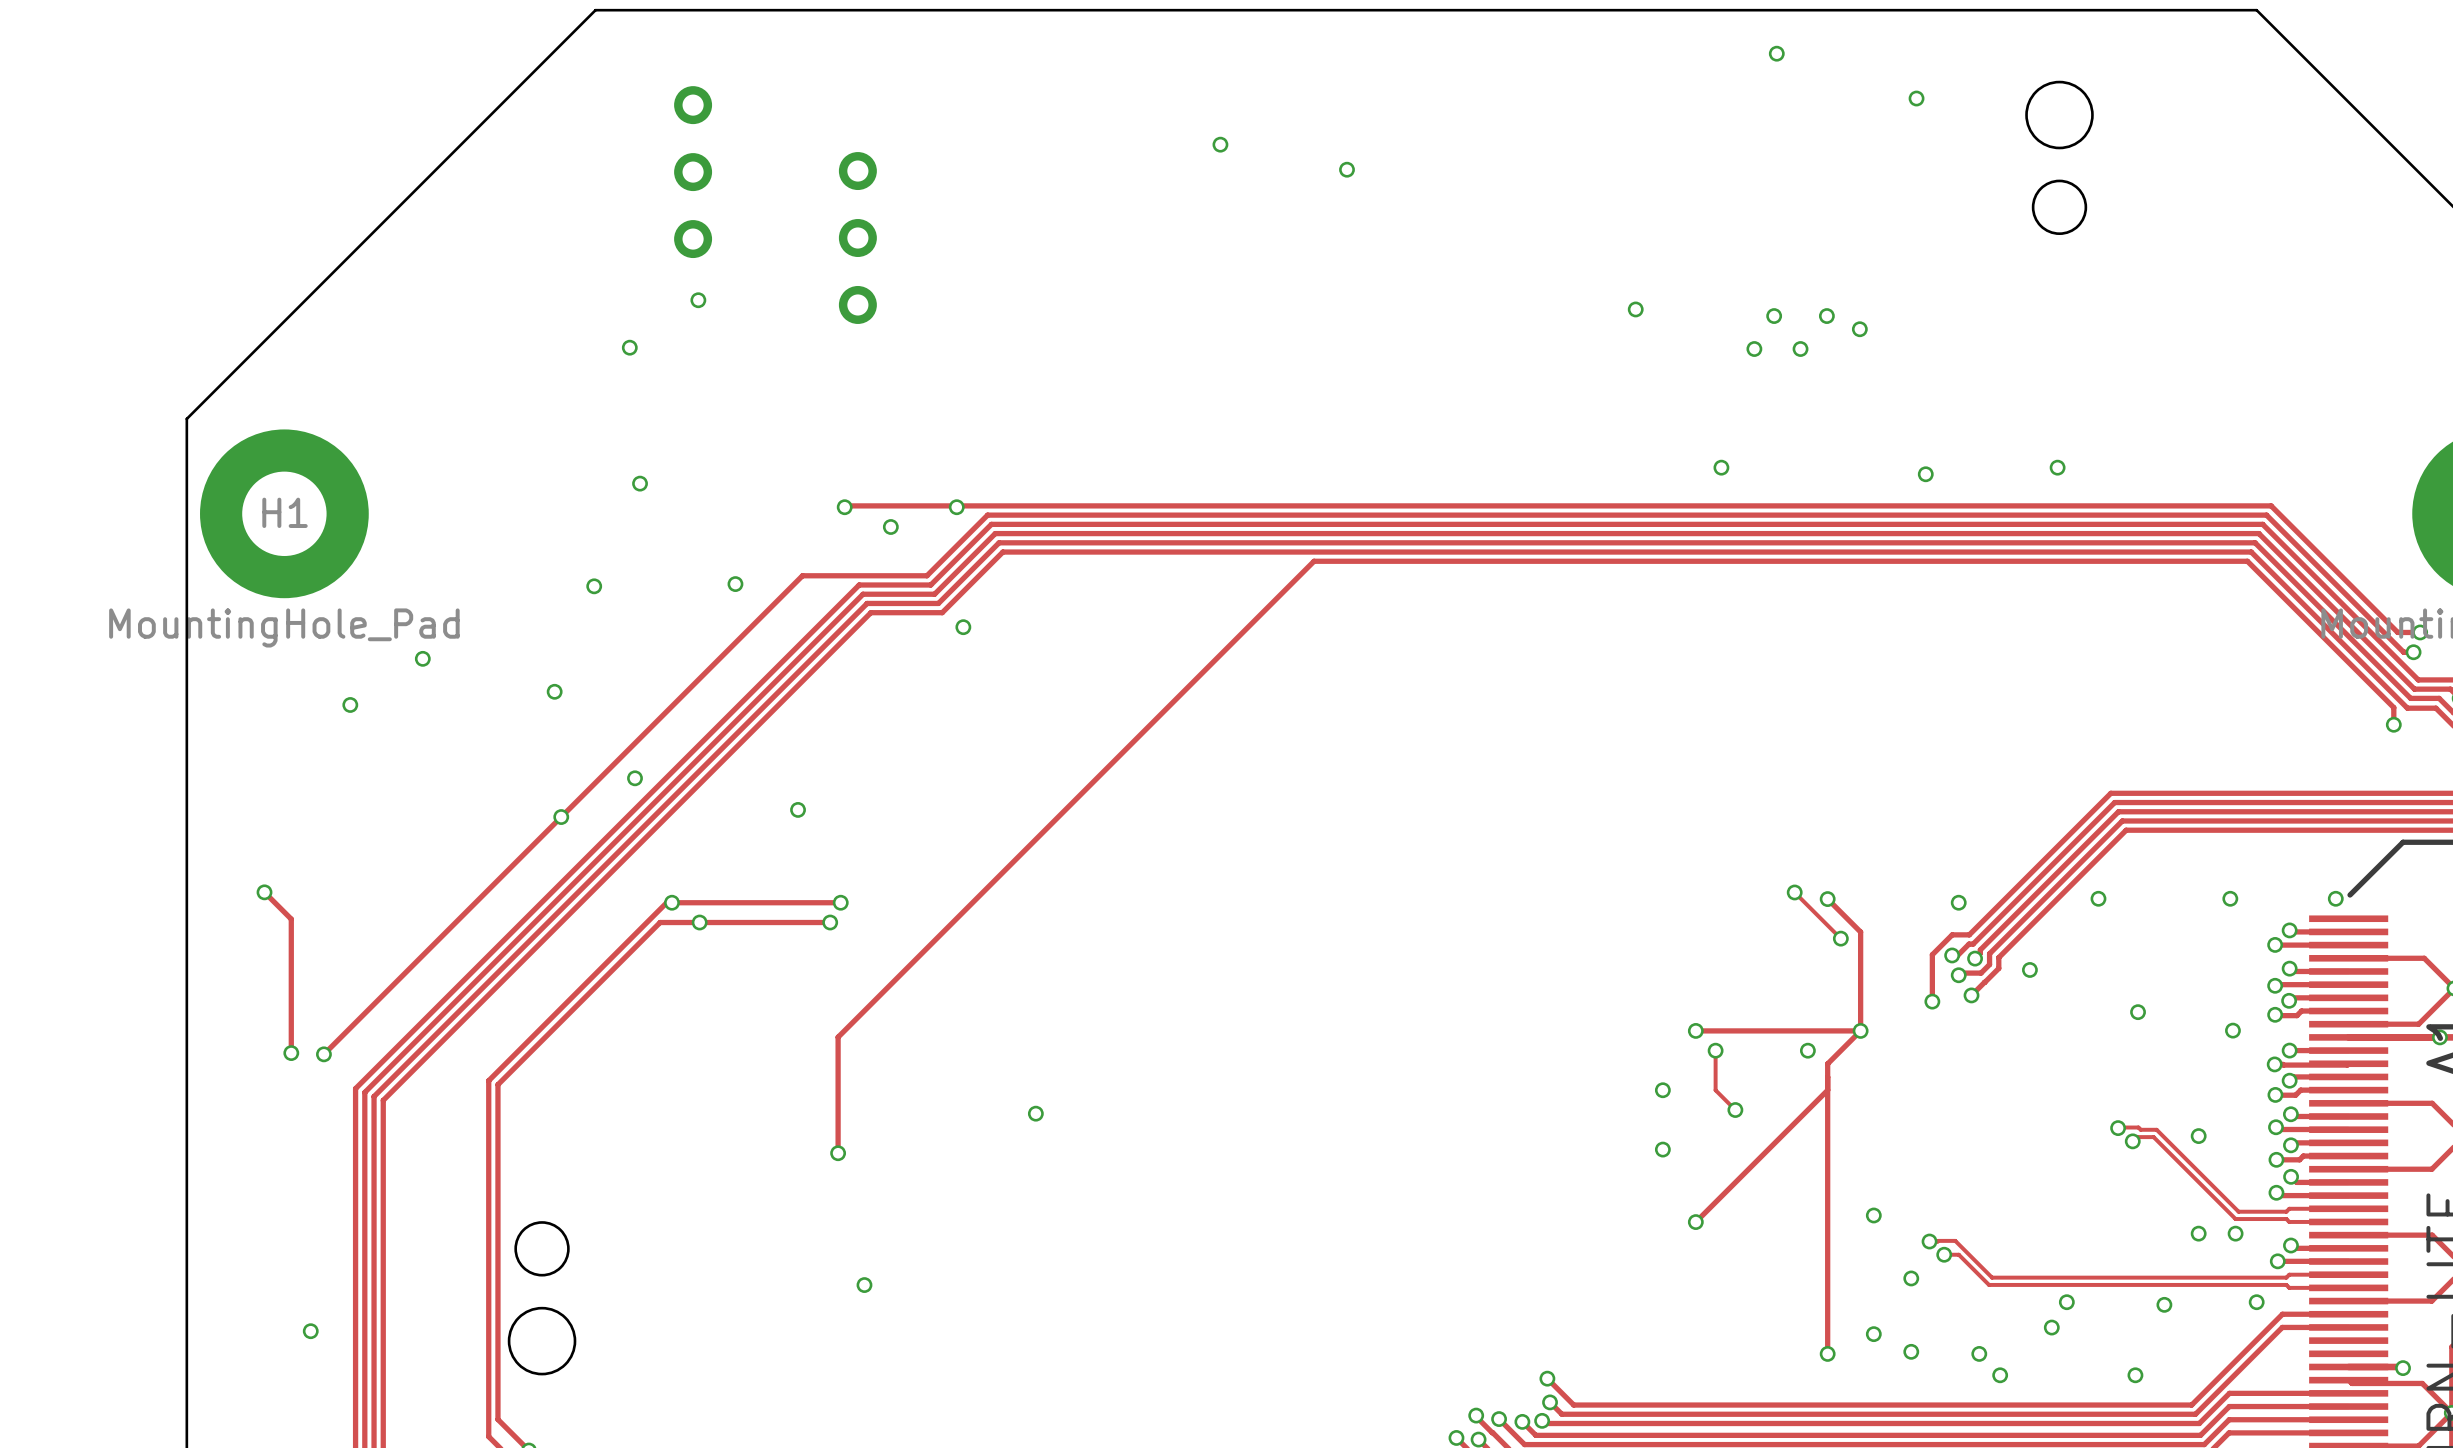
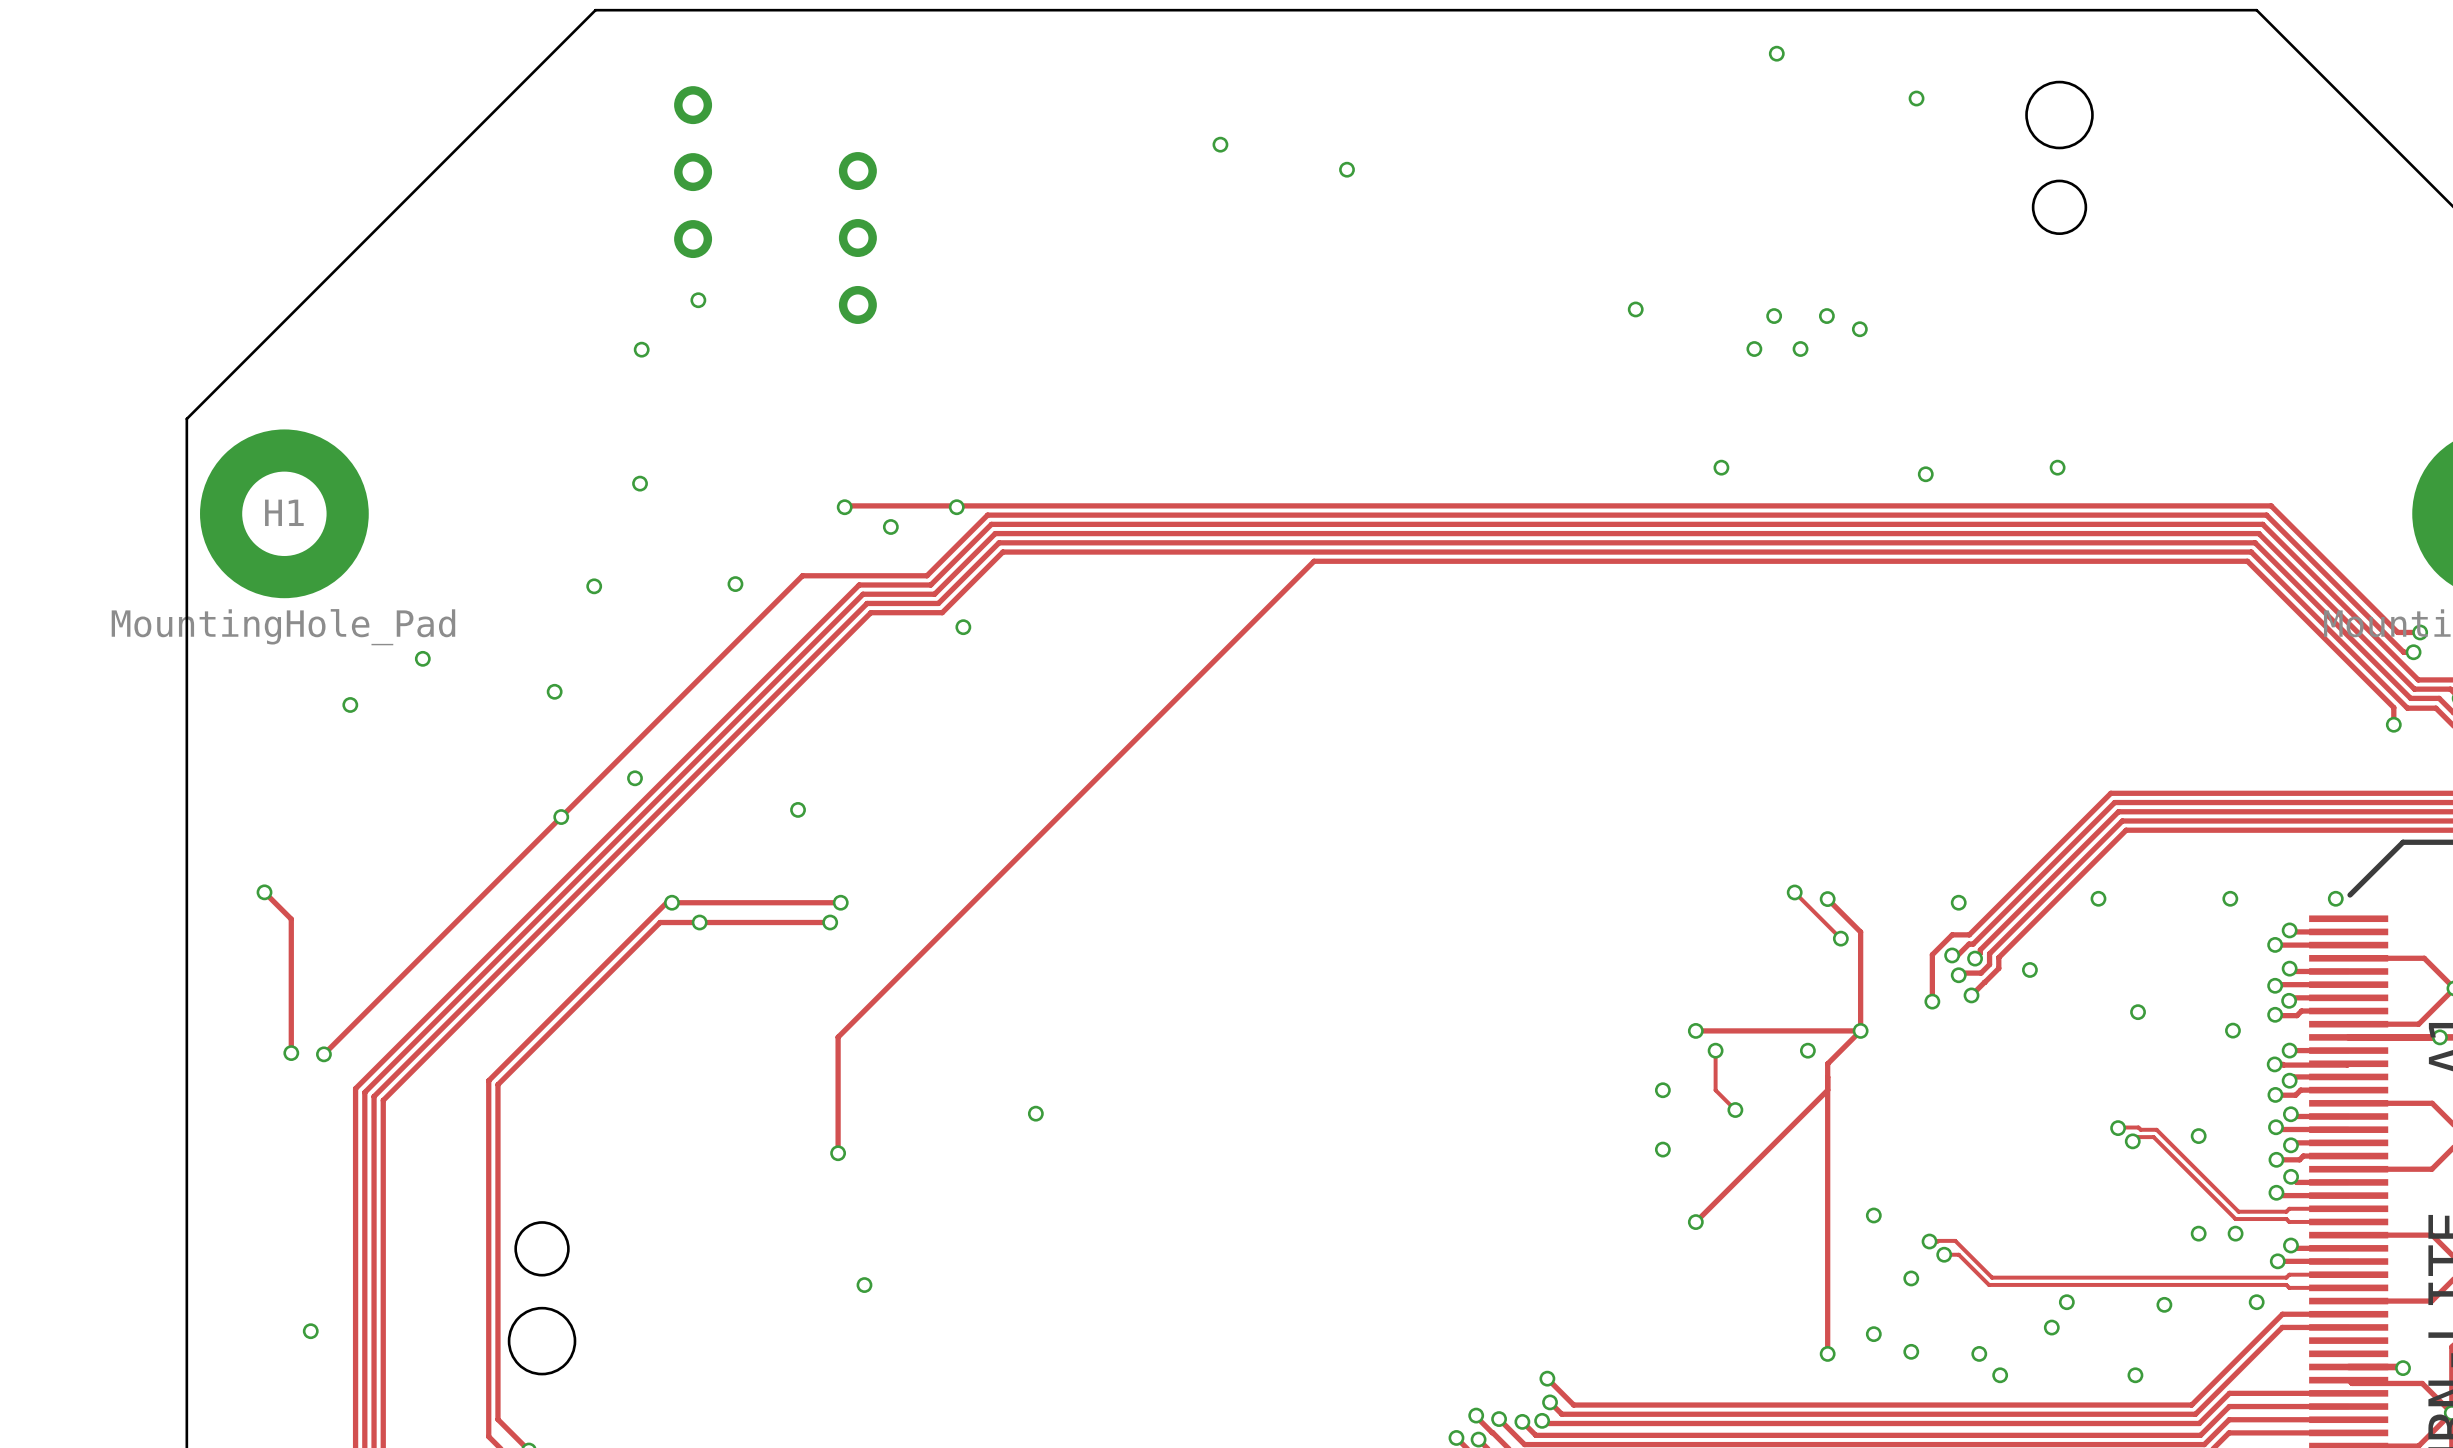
via position: (629, 347) -> (641, 349)

